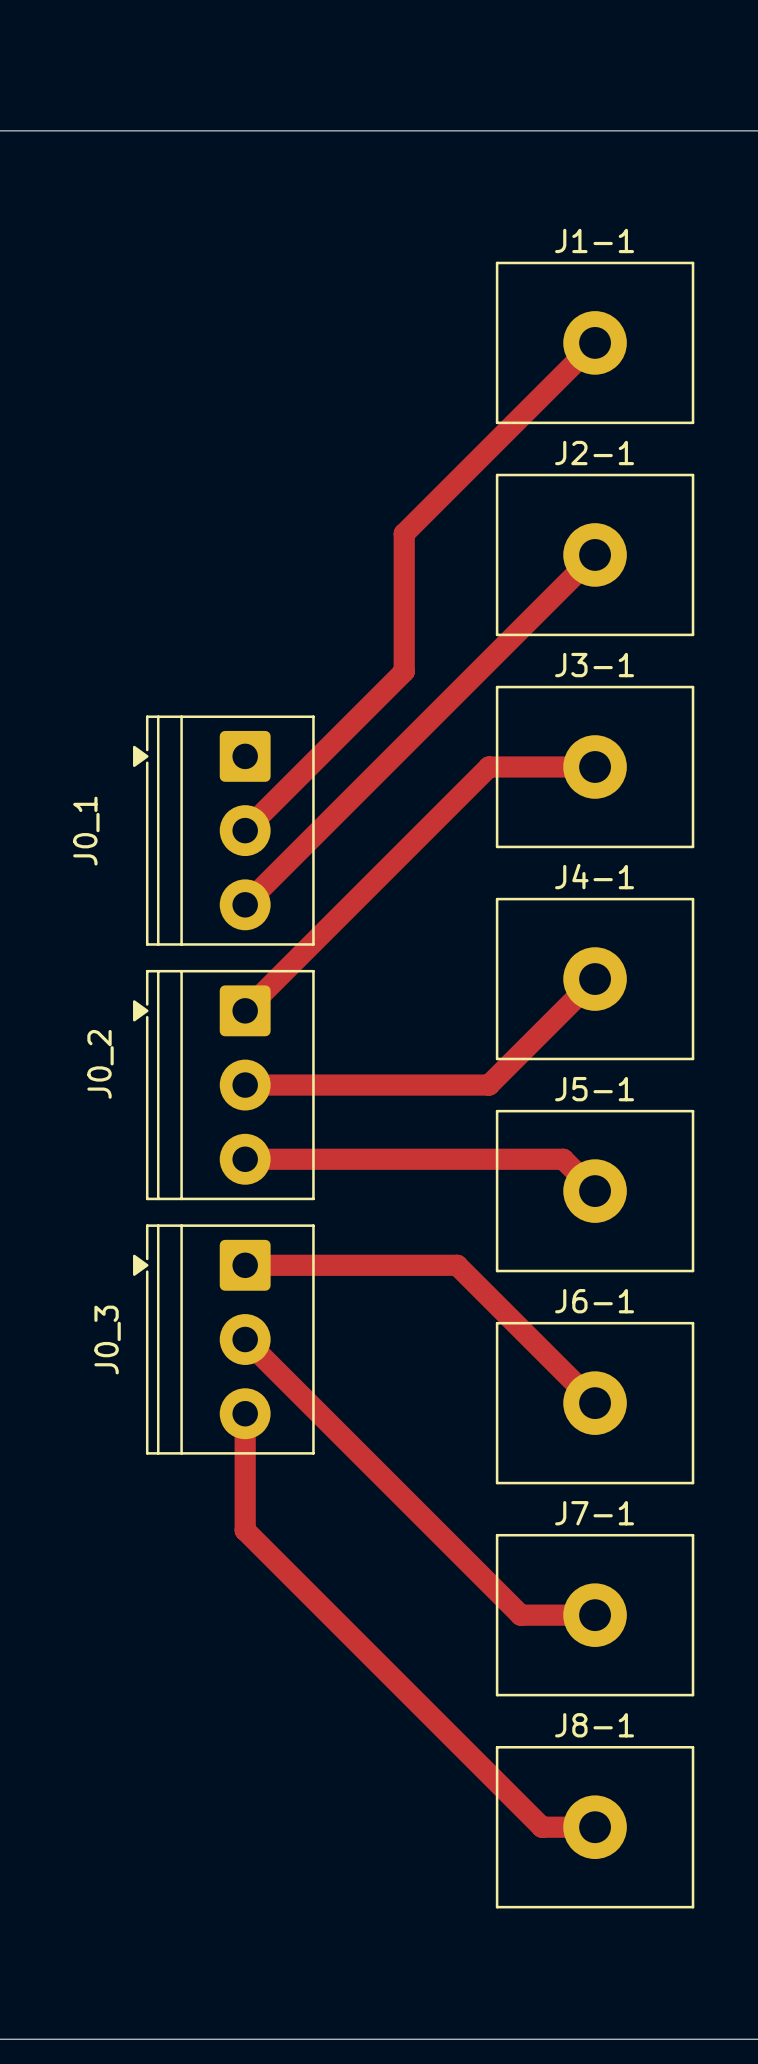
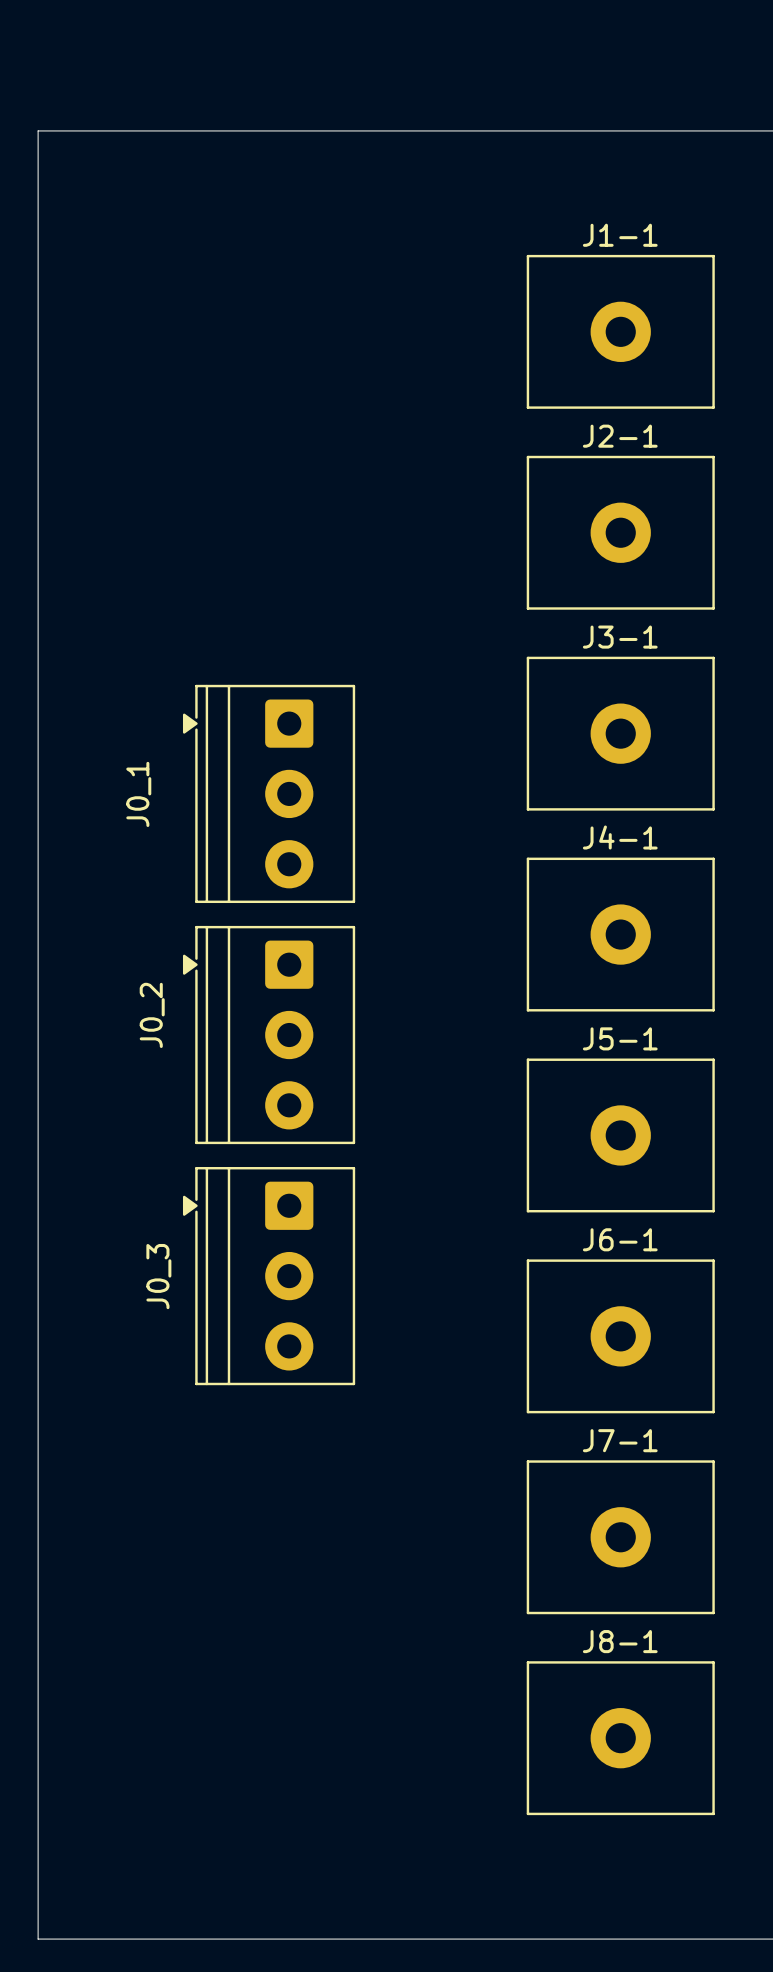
track: (595, 342) (404, 533) (404, 671) (245, 830) -> none
track: (595, 554) (245, 904) -> none
track: (595, 766) (489, 766) (245, 1010) -> none
track: (595, 979) (489, 1085) (245, 1085) -> none
track: (245, 1159) (563, 1159) (595, 1191) -> none
track: (245, 1265) (457, 1265) (595, 1403) -> none
track: (245, 1339) (520, 1615) (595, 1615) -> none
track: (245, 1413) (245, 1530) (542, 1827) (595, 1827) -> none

